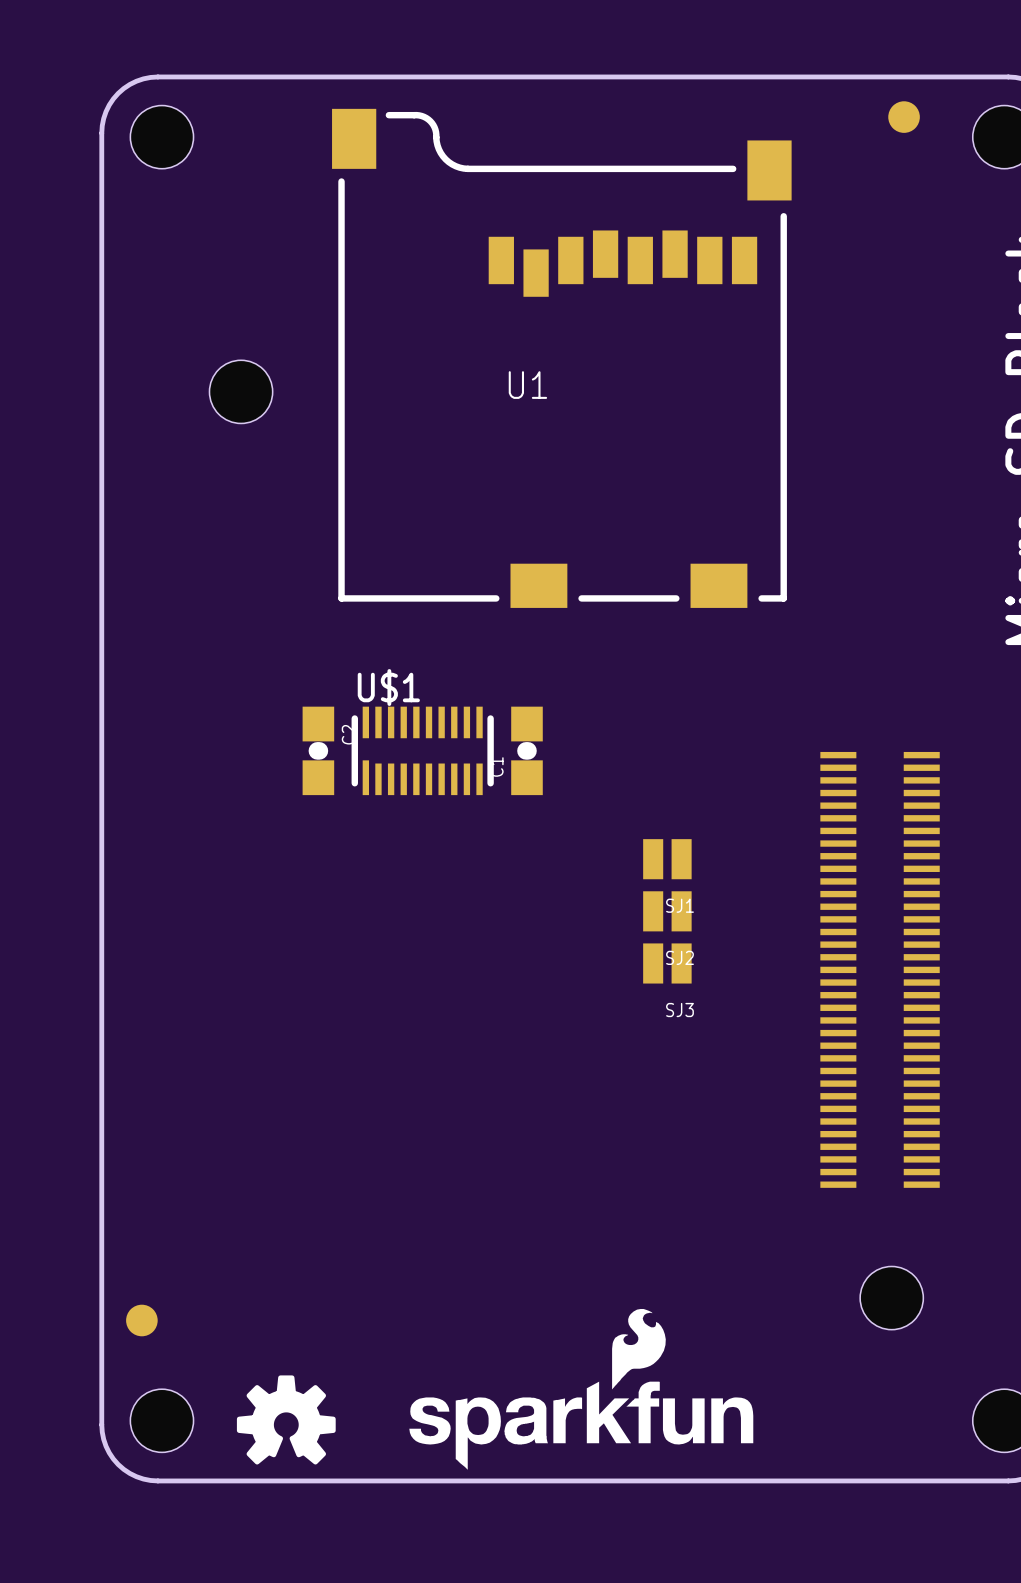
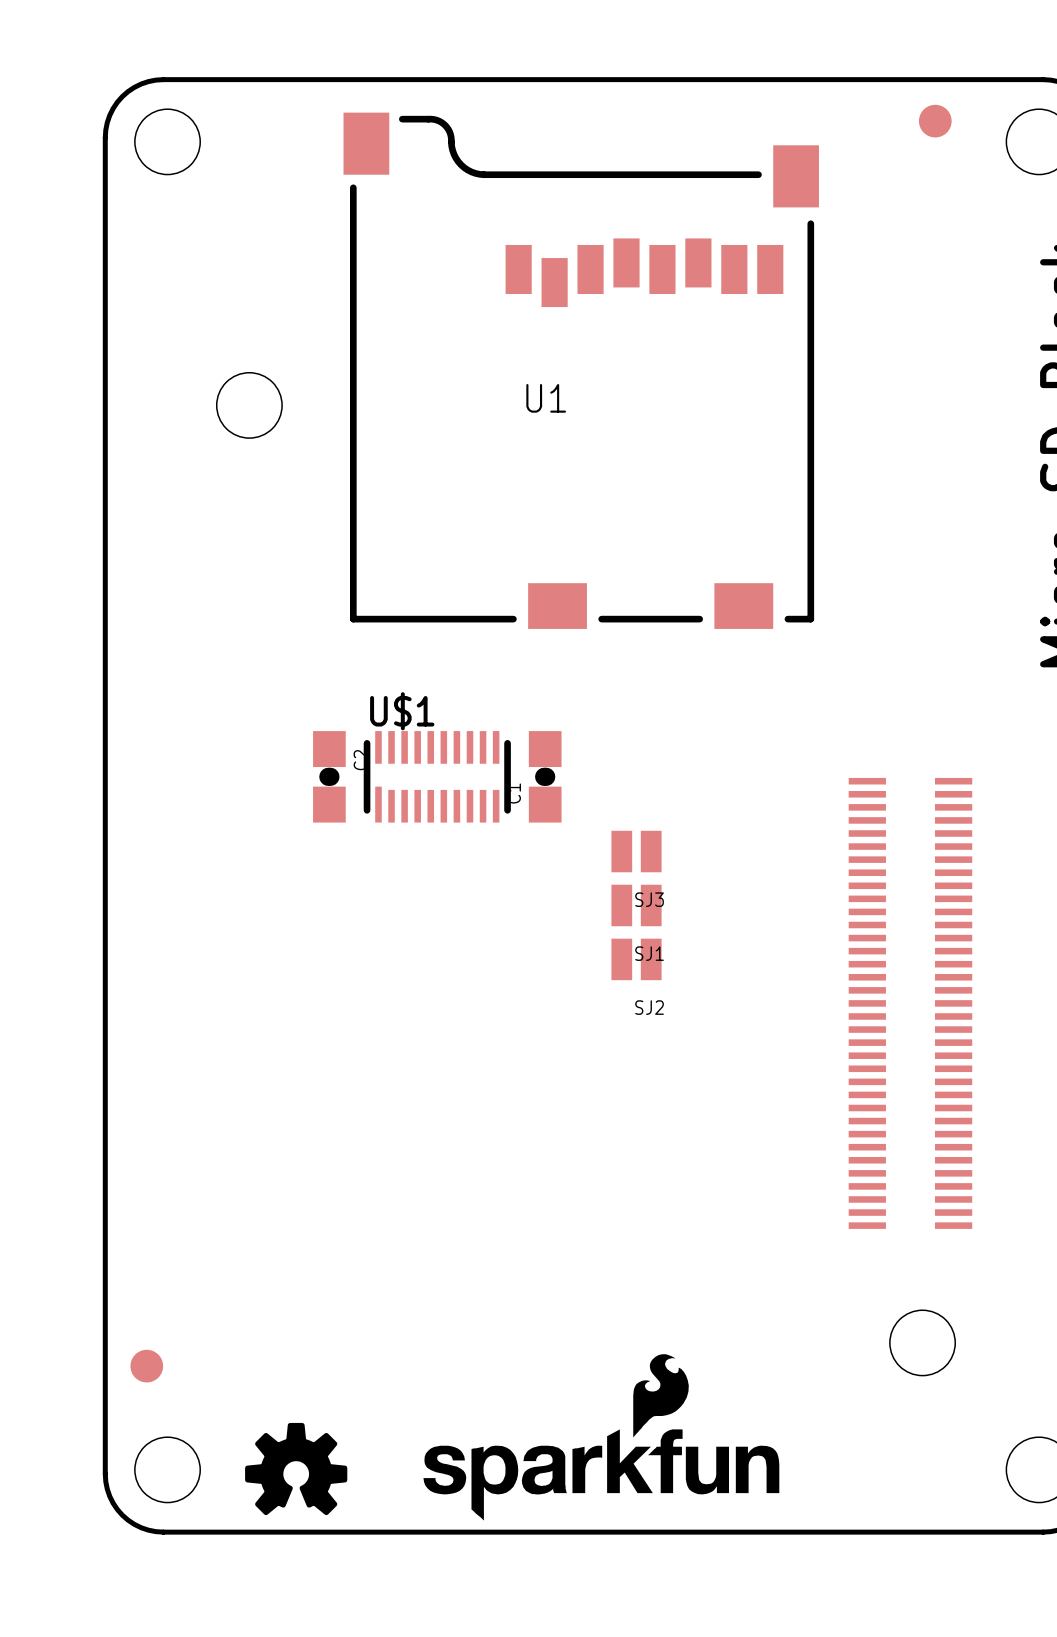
SJ1 position: (667, 859) -> (636, 905)
SJ2 position: (667, 911) -> (636, 959)
SJ3 position: (667, 963) -> (636, 851)

